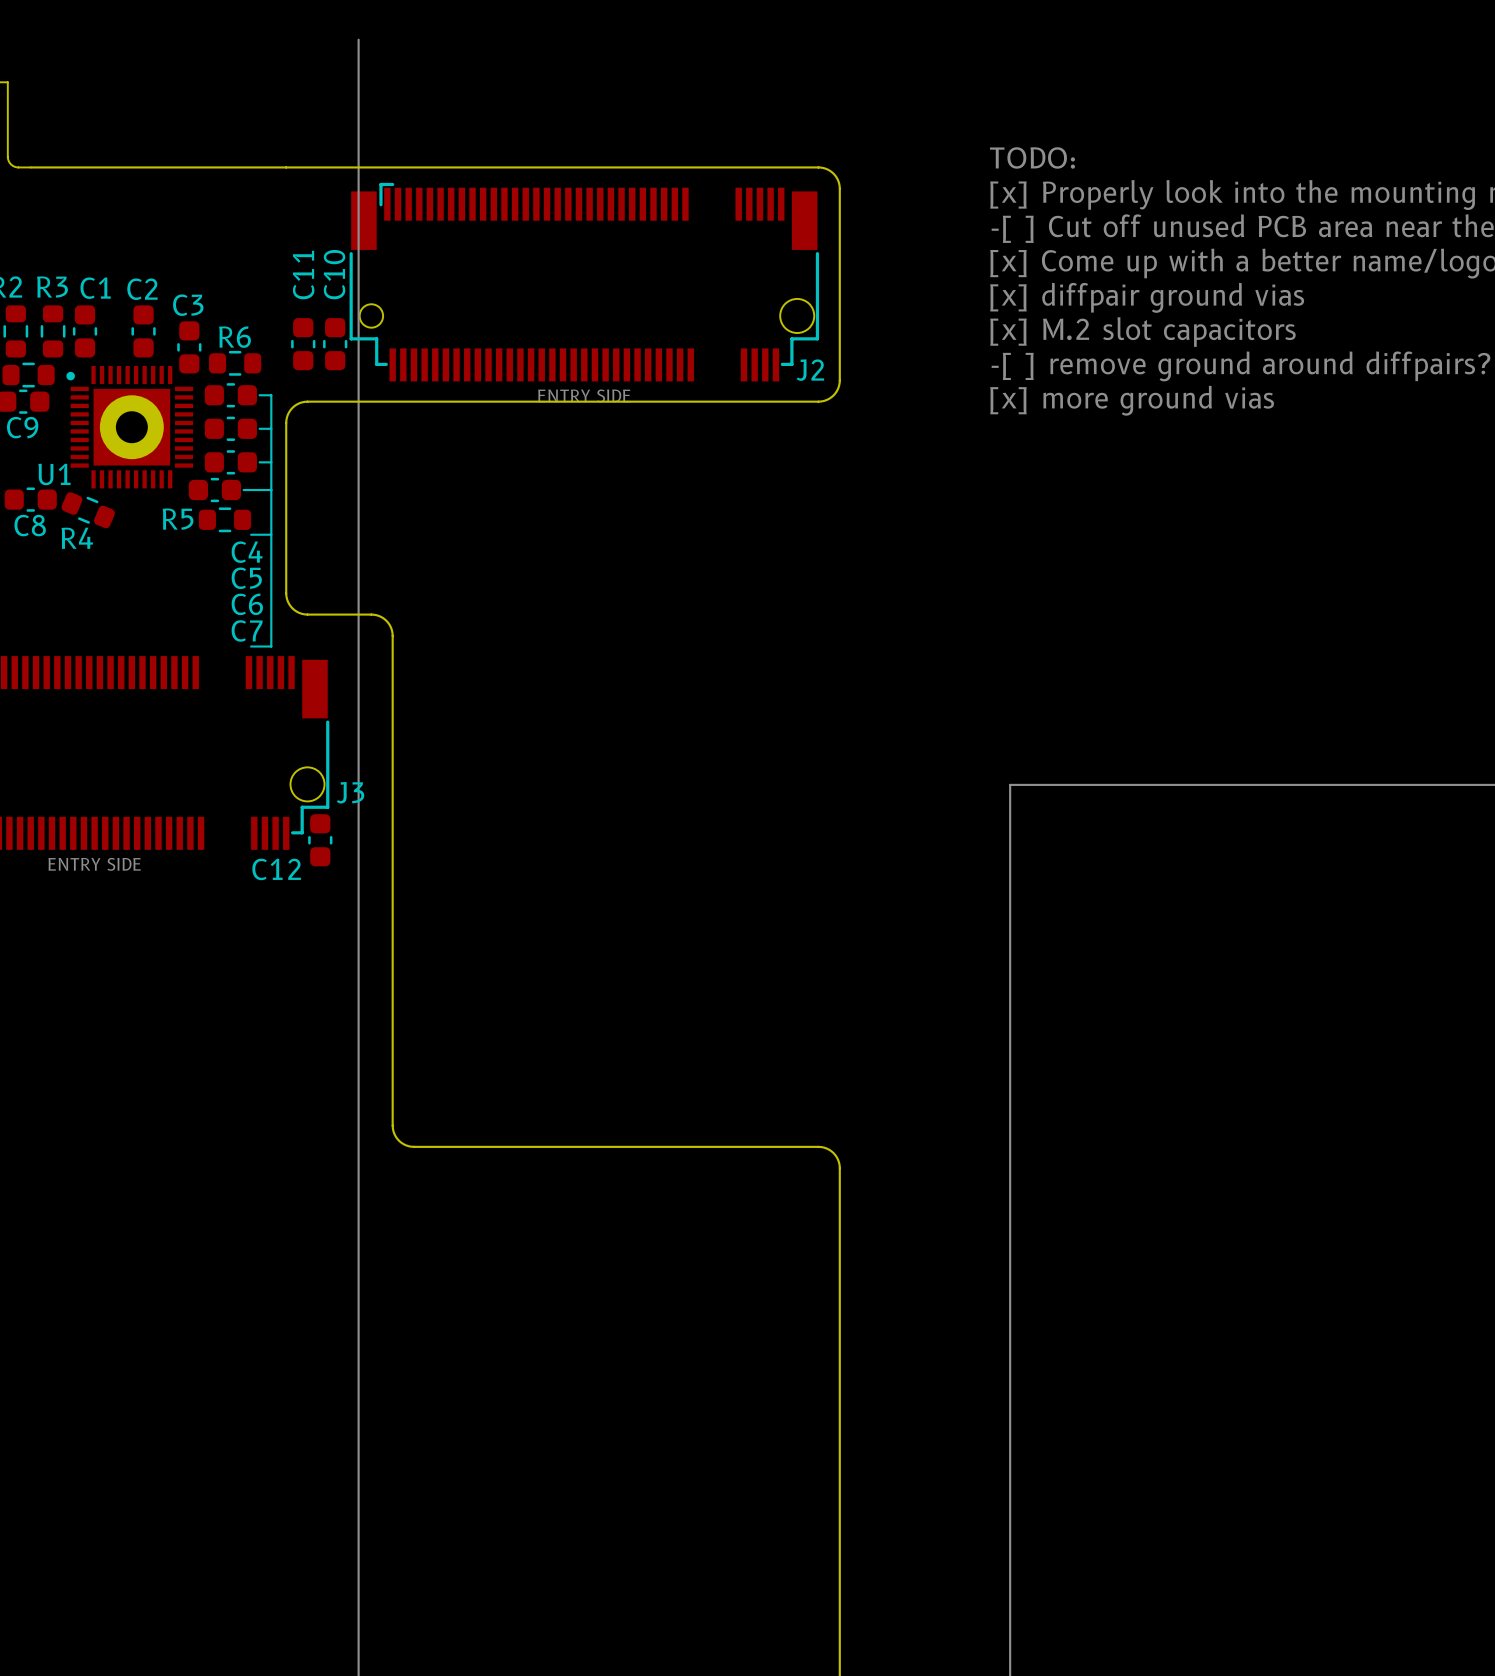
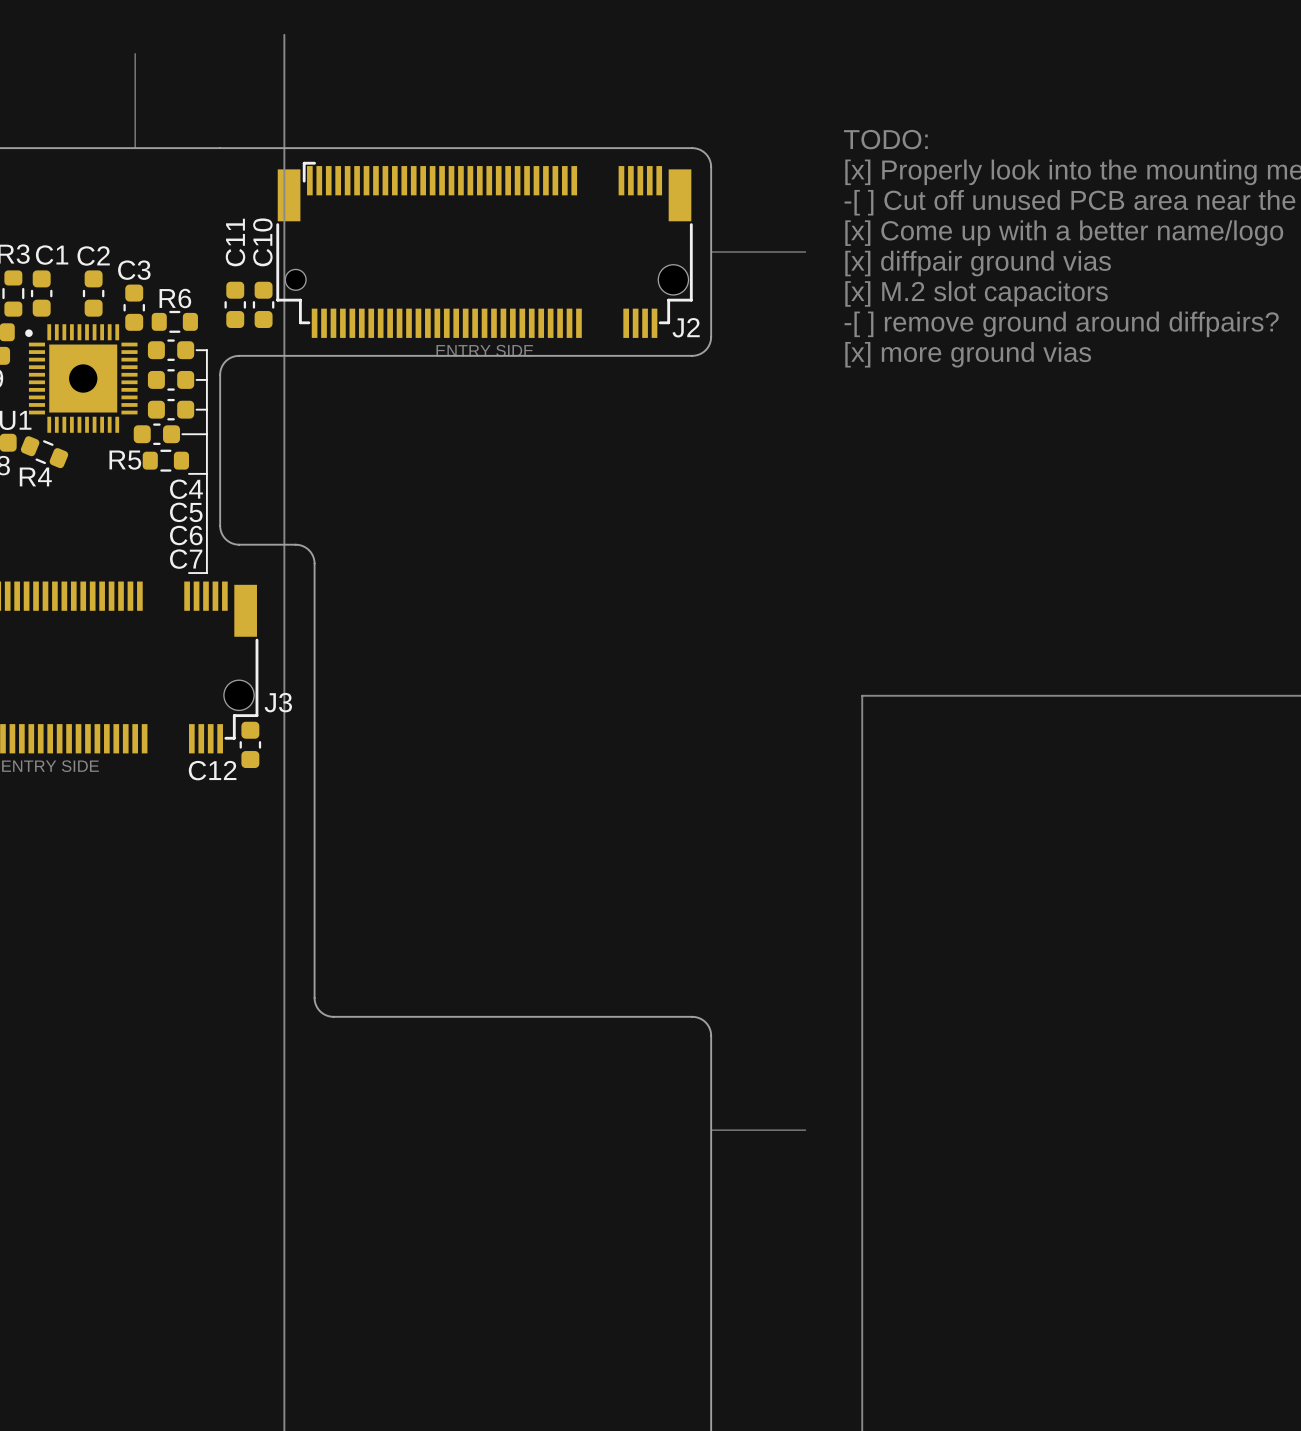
line: none -> (135, 53) (135, 148)
line: none -> (711, 251) (805, 251)
line: none -> (711, 1130) (805, 1130)

